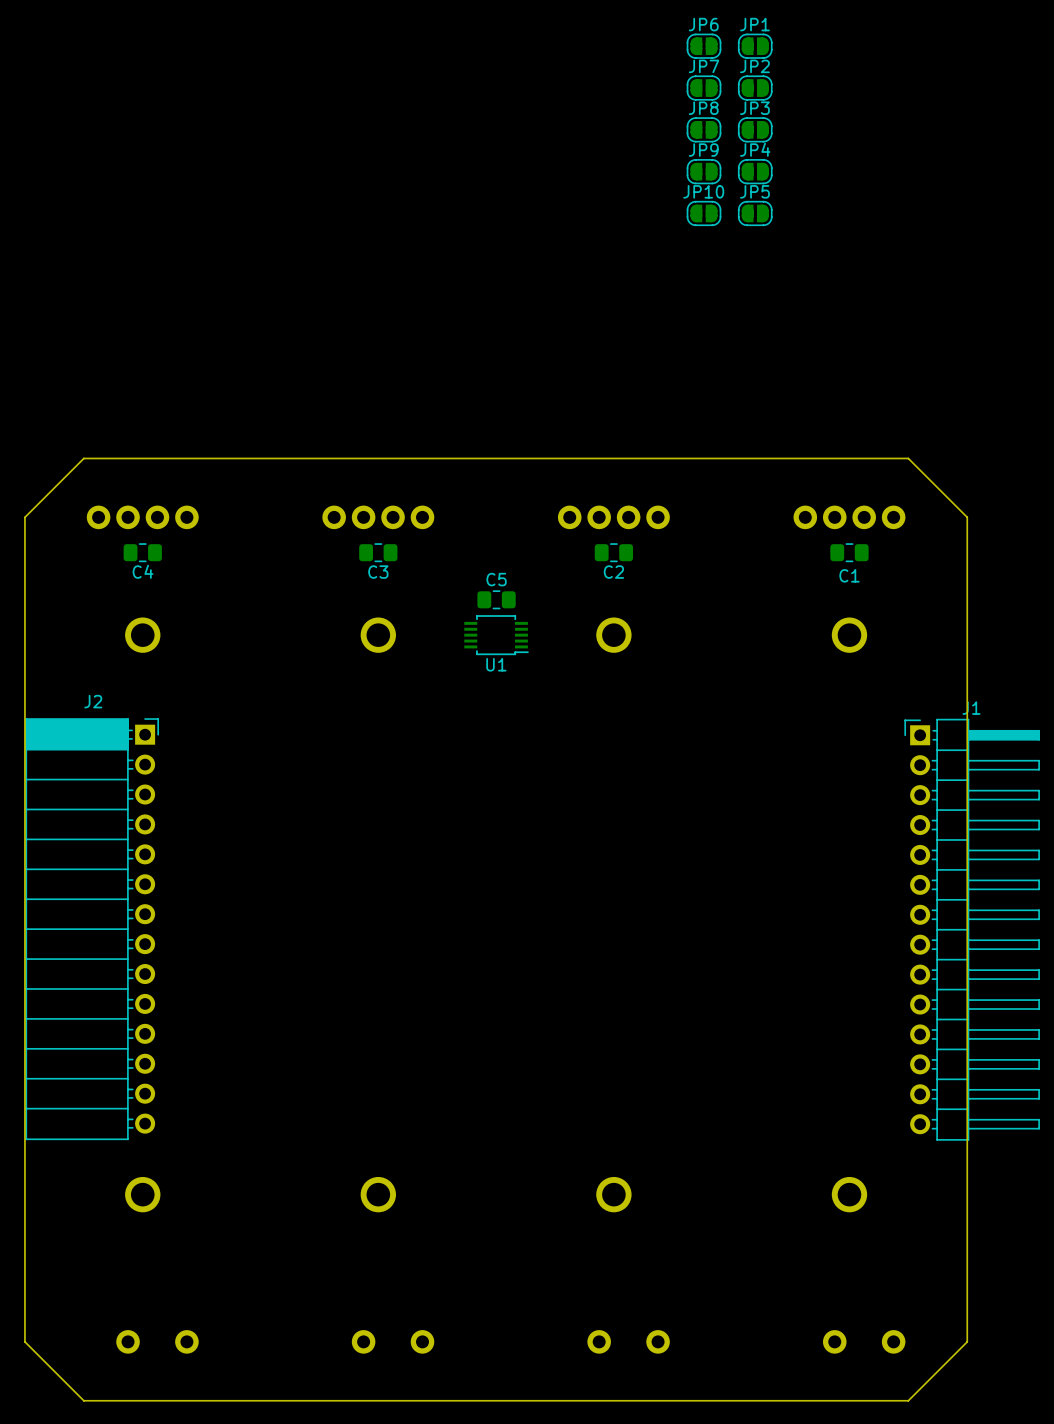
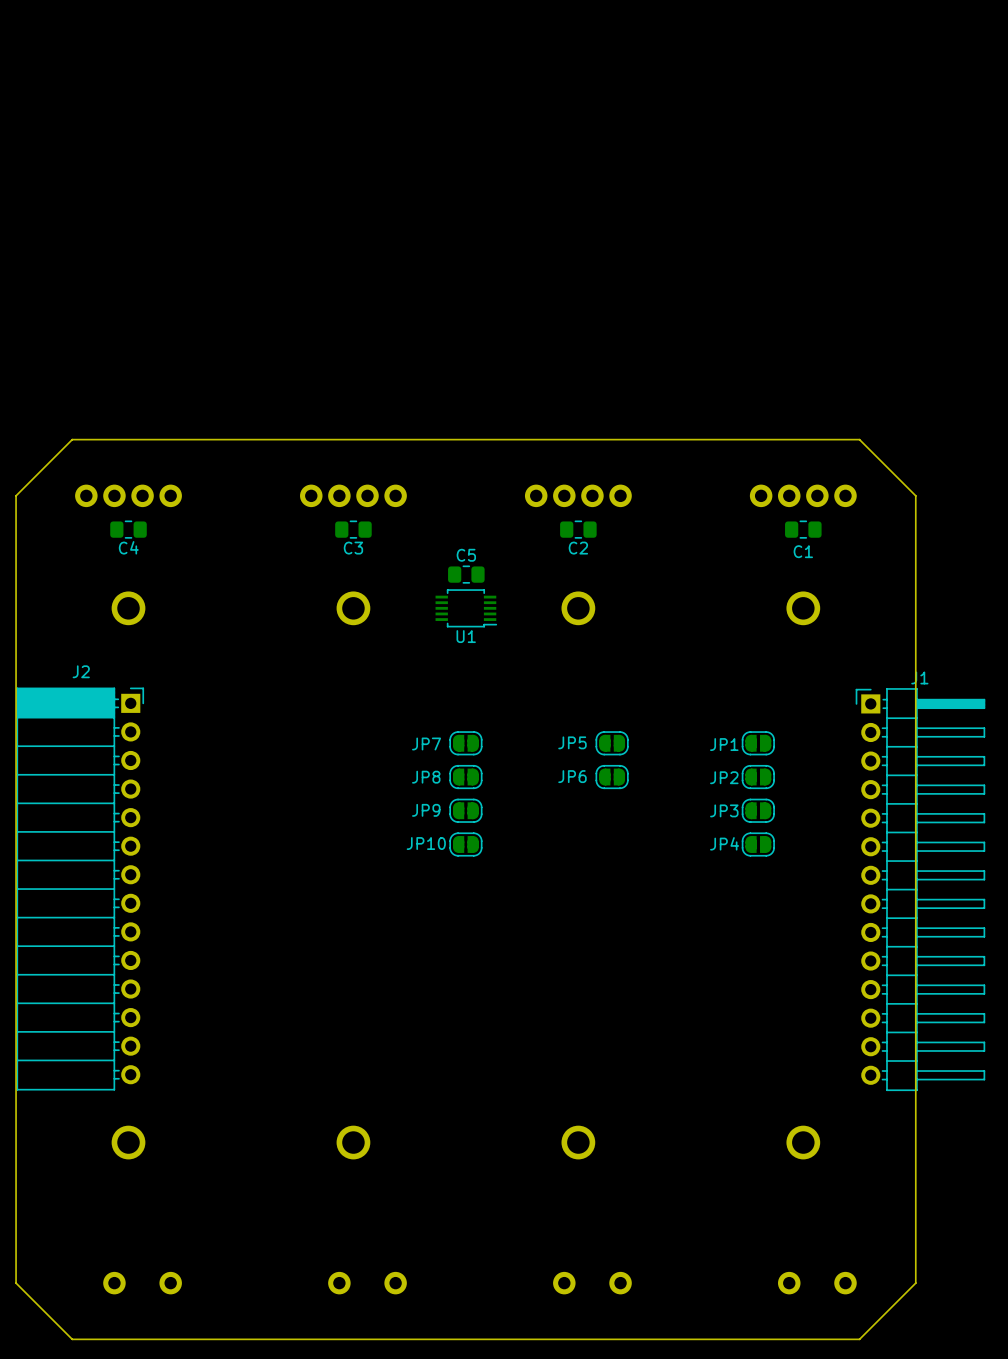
JP6 name position: JP6 (703, 24) -> JP6 (572, 776)
JP1 name position: JP1 (754, 24) -> JP1 (724, 744)
JP6 position: (704, 46) -> (612, 777)
JP1 position: (755, 46) -> (758, 743)
JP7 name position: JP7 (704, 66) -> JP7 (426, 743)
JP2 name position: JP2 (754, 66) -> JP2 (724, 777)
JP7 position: (704, 88) -> (465, 743)
JP2 position: (755, 88) -> (758, 777)
JP8 name position: JP8 (703, 108) -> JP8 (426, 777)
JP3 name position: JP3 (754, 108) -> JP3 (724, 810)
JP8 position: (704, 129) -> (465, 777)
JP3 position: (755, 129) -> (758, 810)
JP4 name position: JP4 (755, 149) -> JP4 (724, 843)
JP9 name position: JP9 (703, 150) -> JP9 (426, 810)
JP9 position: (704, 171) -> (465, 810)
JP4 position: (755, 171) -> (758, 844)
JP10 name position: JP10 (703, 191) -> JP10 (426, 843)
JP5 name position: JP5 (754, 191) -> JP5 (572, 742)
JP10 position: (704, 213) -> (465, 844)
JP5 position: (755, 213) -> (612, 743)

